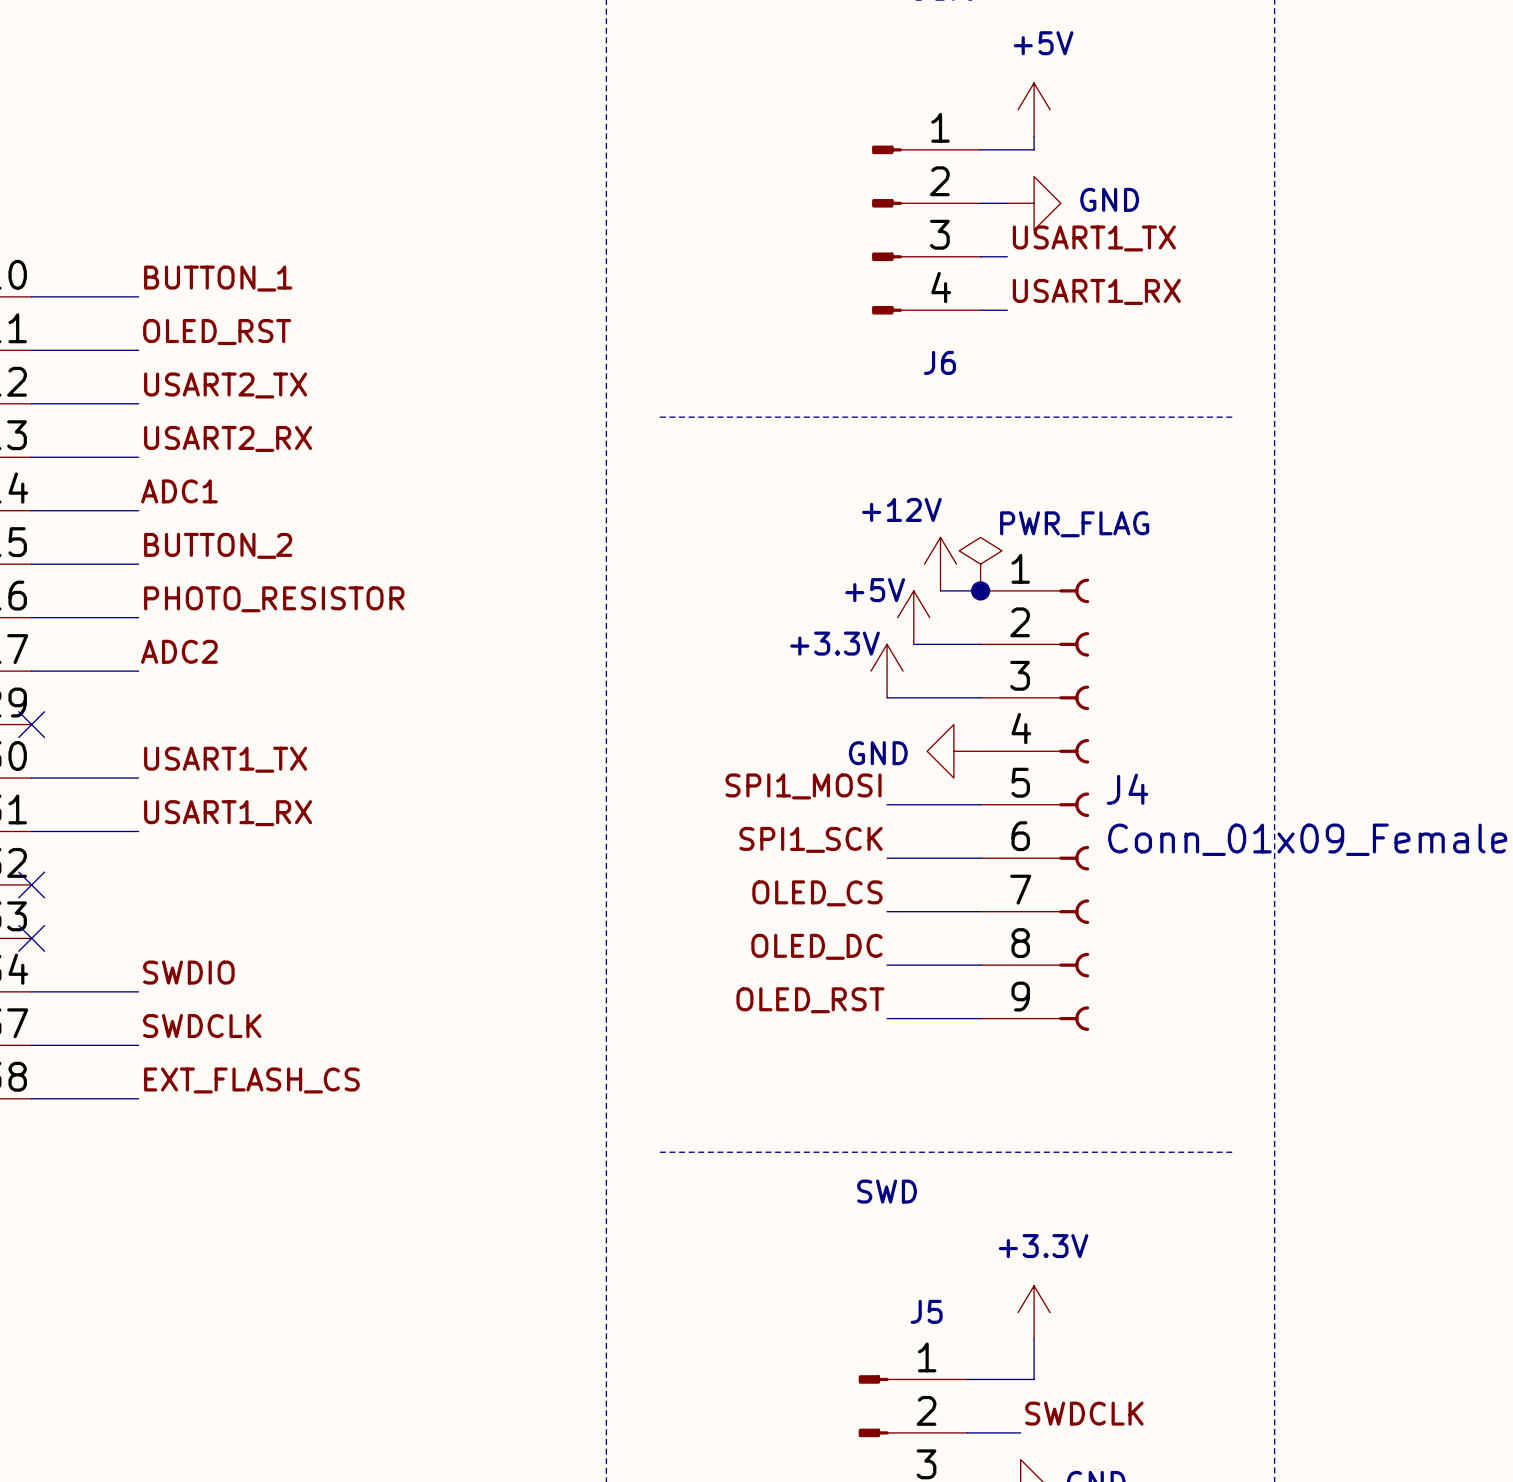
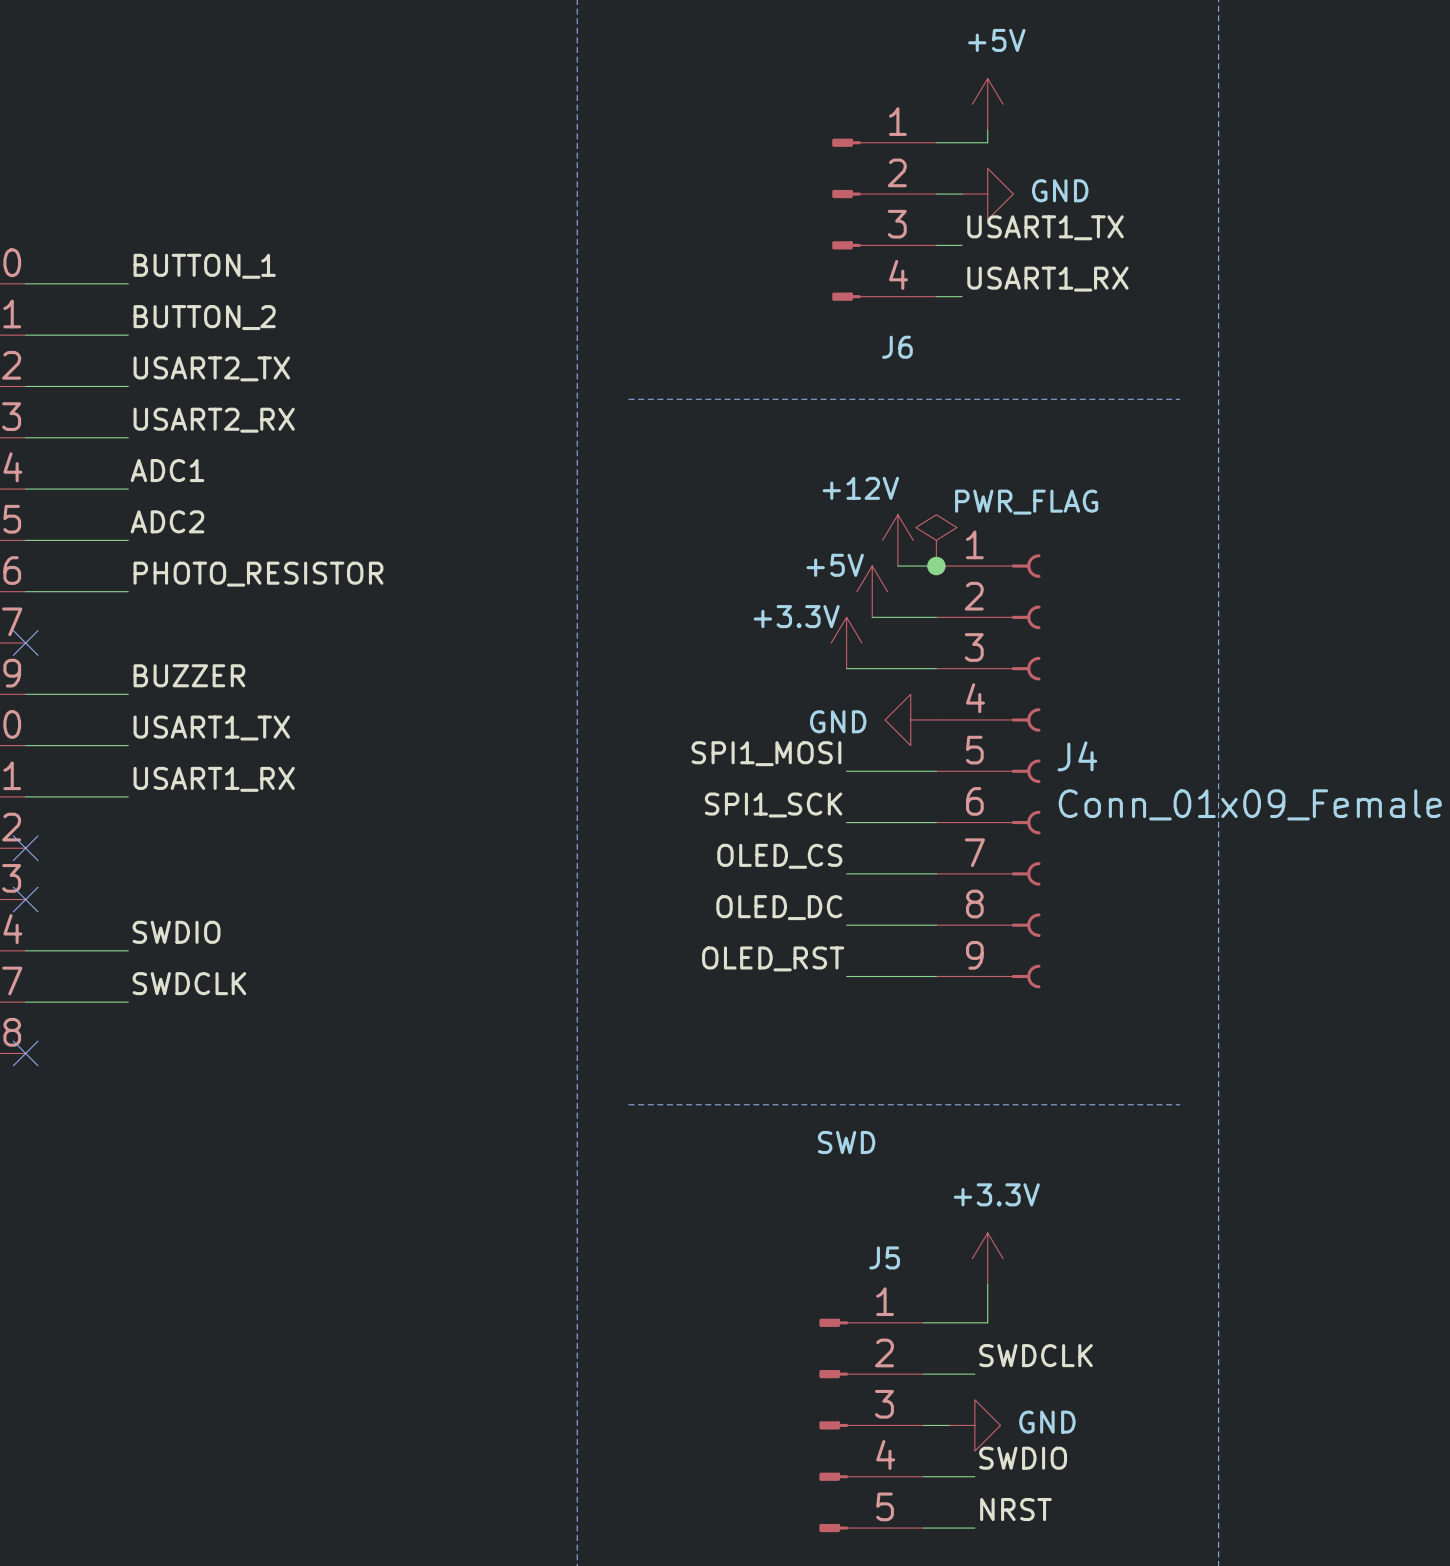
label: OLED_RST (217, 332) -> BUTTON_2 (204, 317)
label: BUTTON_2 (218, 545) -> ADC2 (167, 521)
label: ADC2 (179, 651) -> none
wire: (31, 671) (138, 671) -> (25, 694) (128, 694)
label: none -> BUZZER (189, 675)
no-connect mark position: (31, 724) -> (25, 643)
label: EXT_FLASH_CS (251, 1080) -> none
wire: (31, 1098) (138, 1098) -> none
no-connect mark: none -> (25, 1053)

